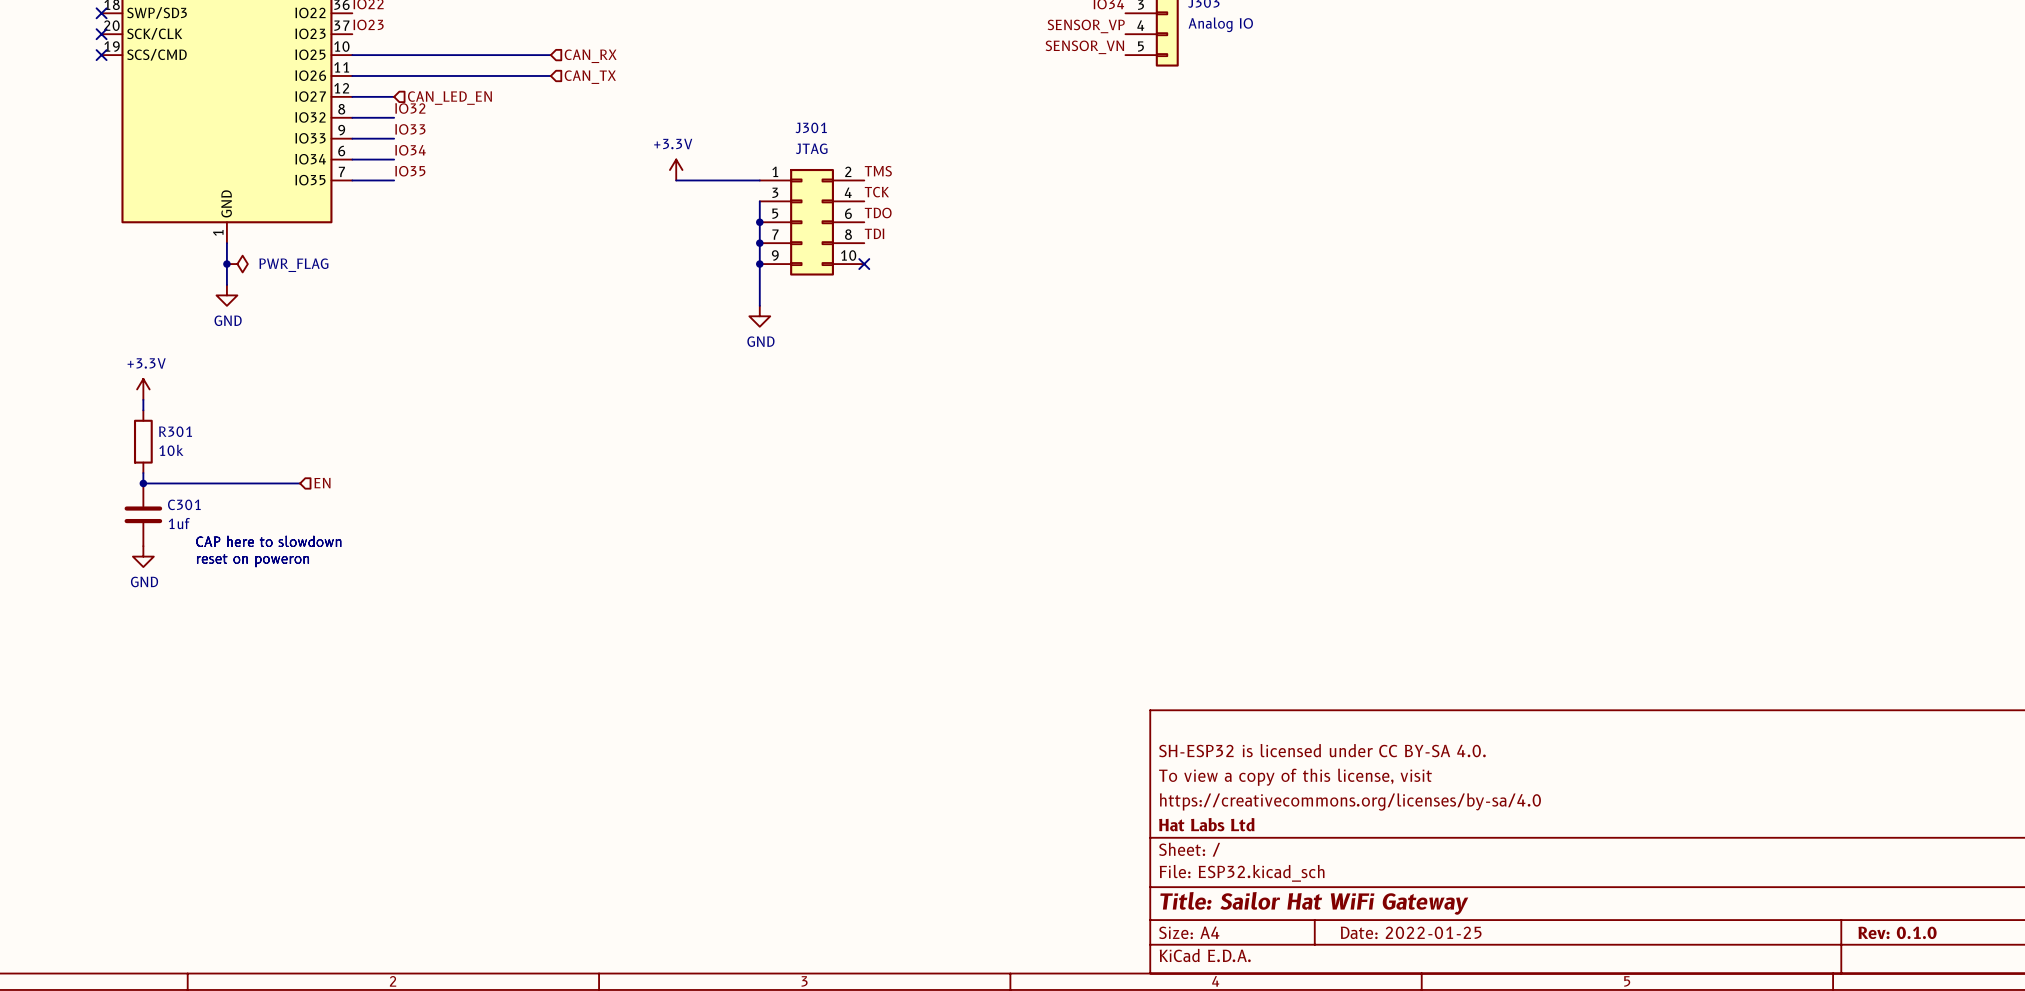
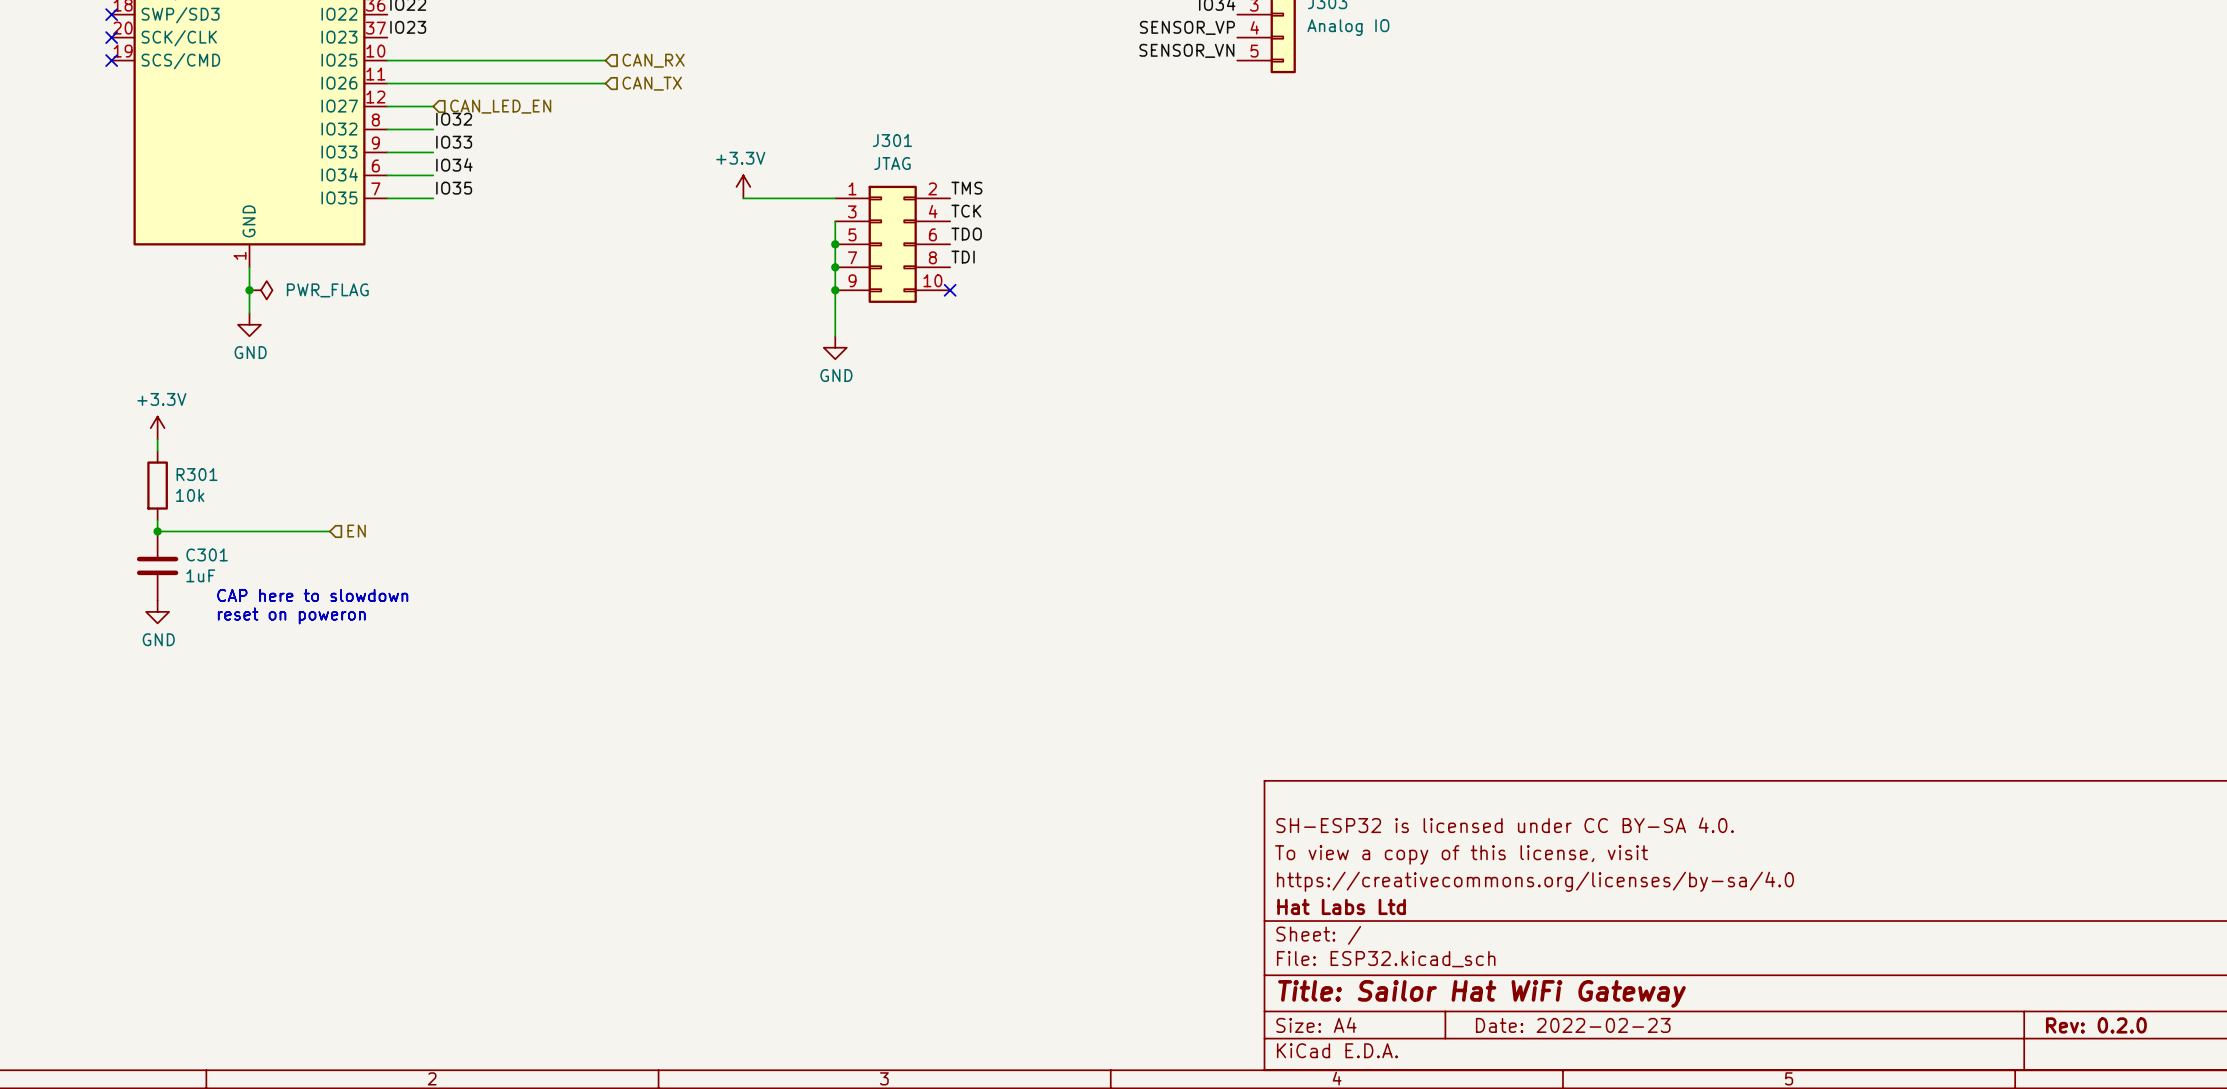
C301 value: 1uf (179, 523) -> 1uF (200, 575)
title block: Date: 2022-01-25 (1411, 932) -> Date: 2022-02-23 (1573, 1025)
title block: Rev: 0.1.0 (1897, 932) -> Rev: 0.2.0 (2096, 1025)

